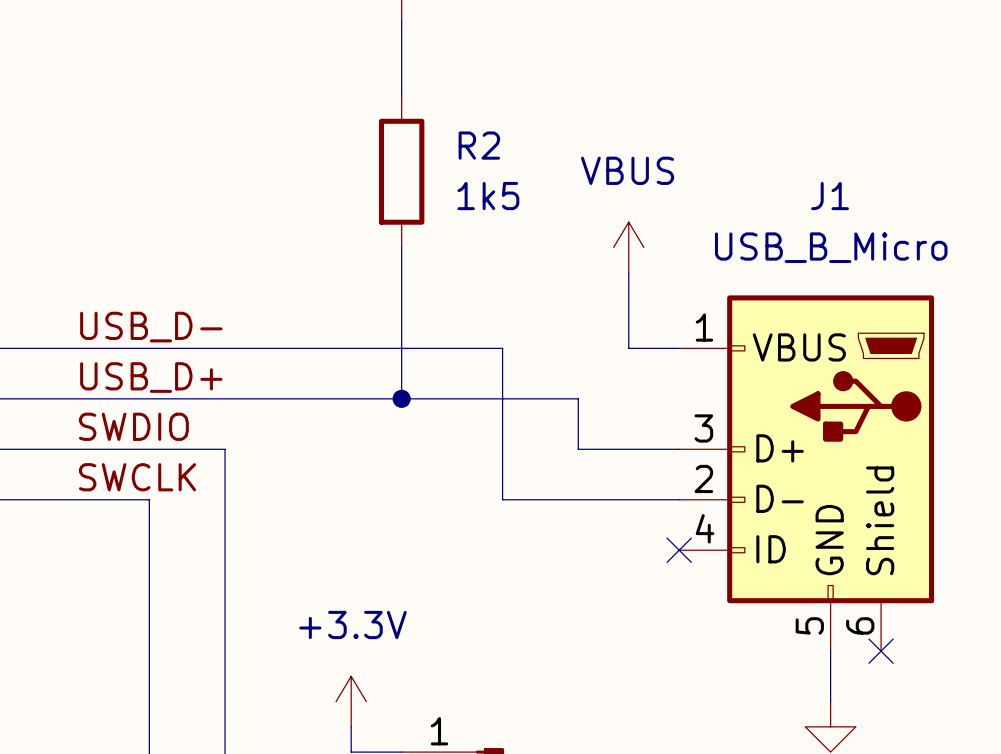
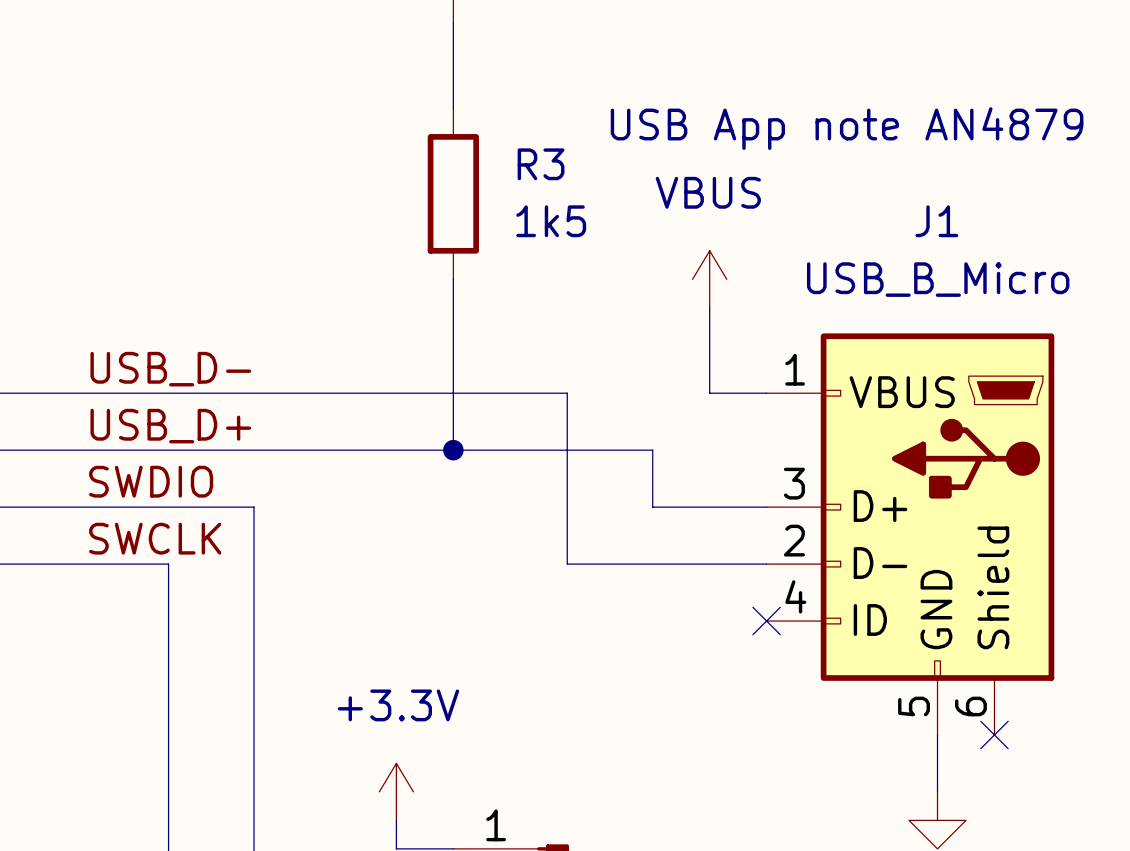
text: none -> USB App note AN4879 (847, 128)
R2 name: R2 (479, 145) -> R3 (541, 164)

